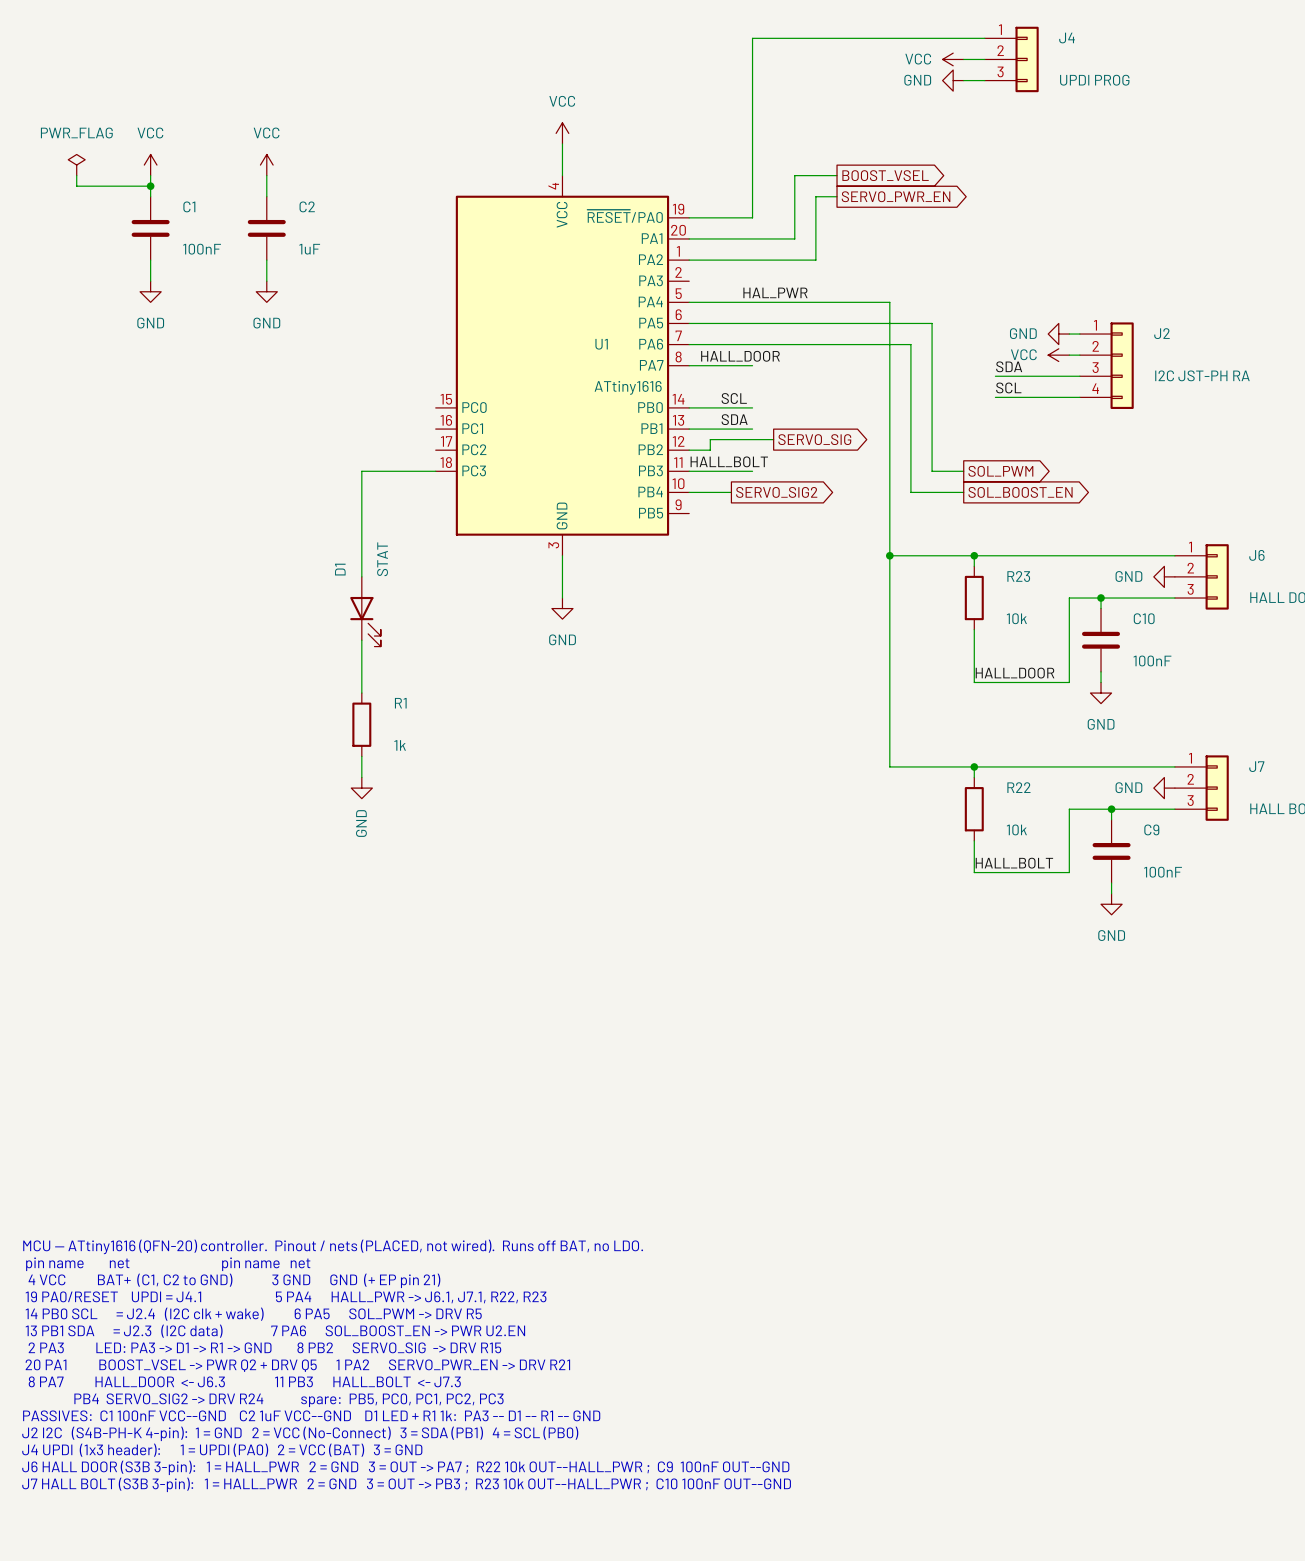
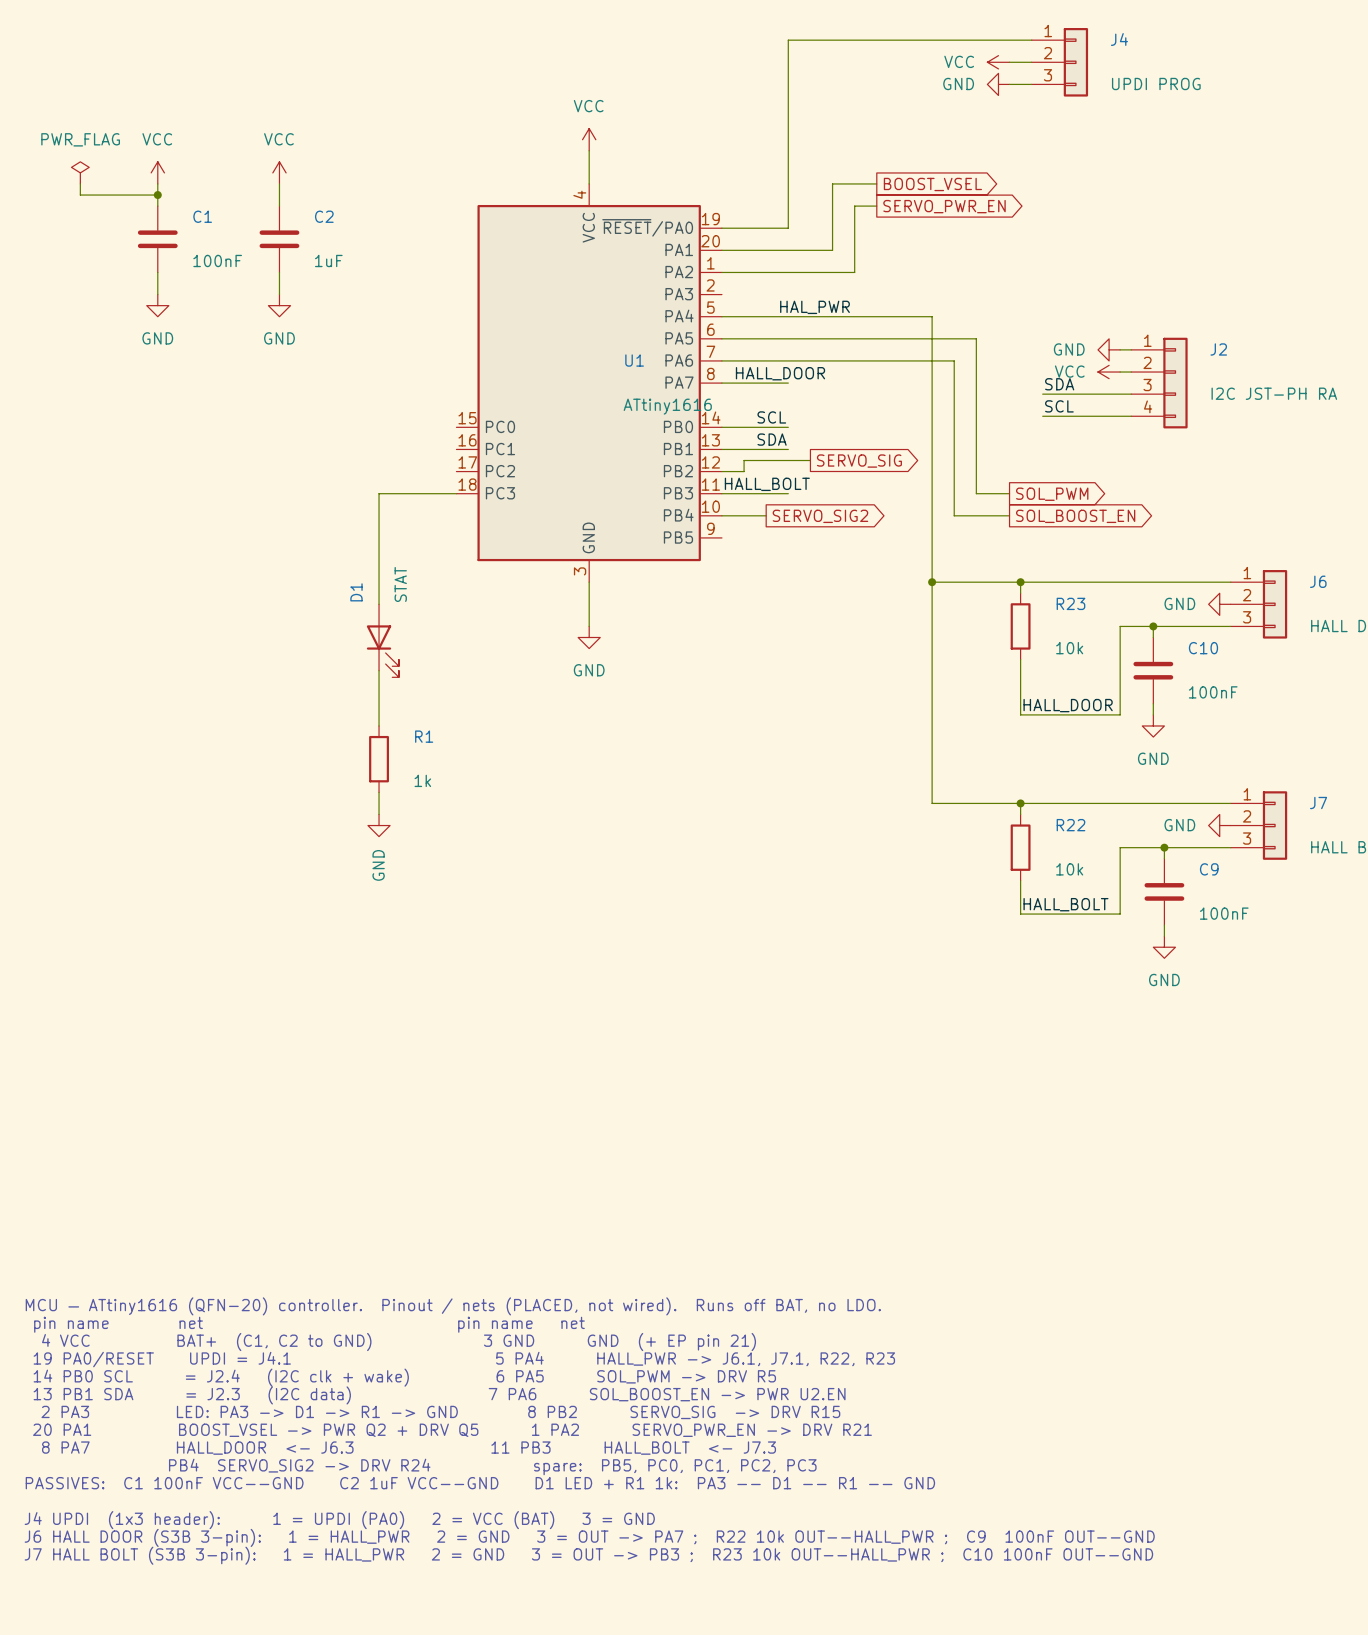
text: J2 I2C (S4B-PH-K 4-pin): 1 = GND 2 = VCC (No-Connect) 3 = SDA (PB1) 4 = SCL (PB0) (300, 1433) -> none

